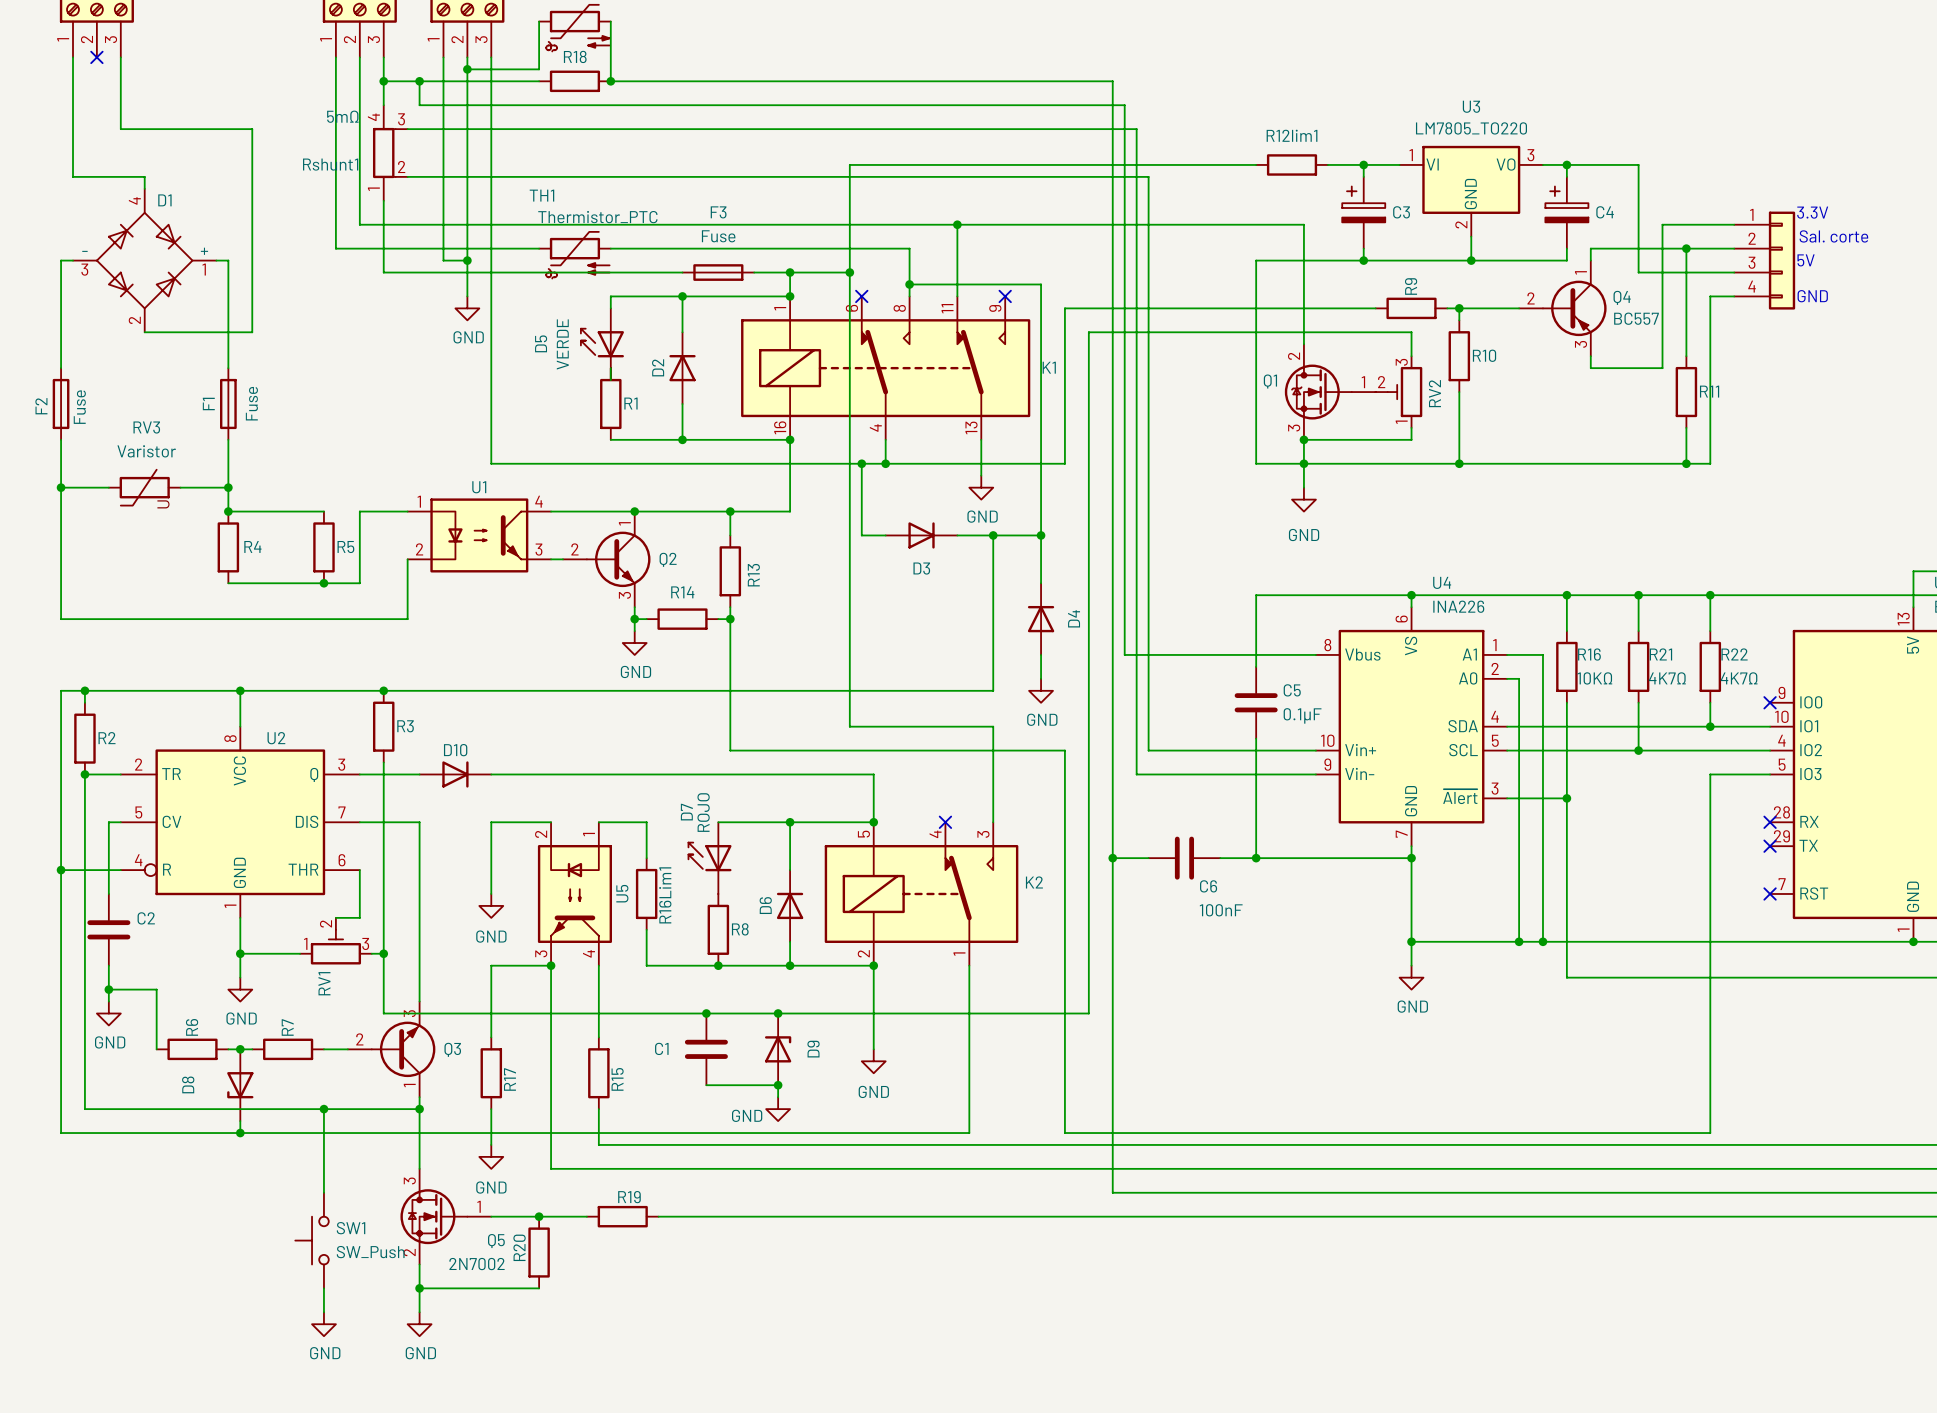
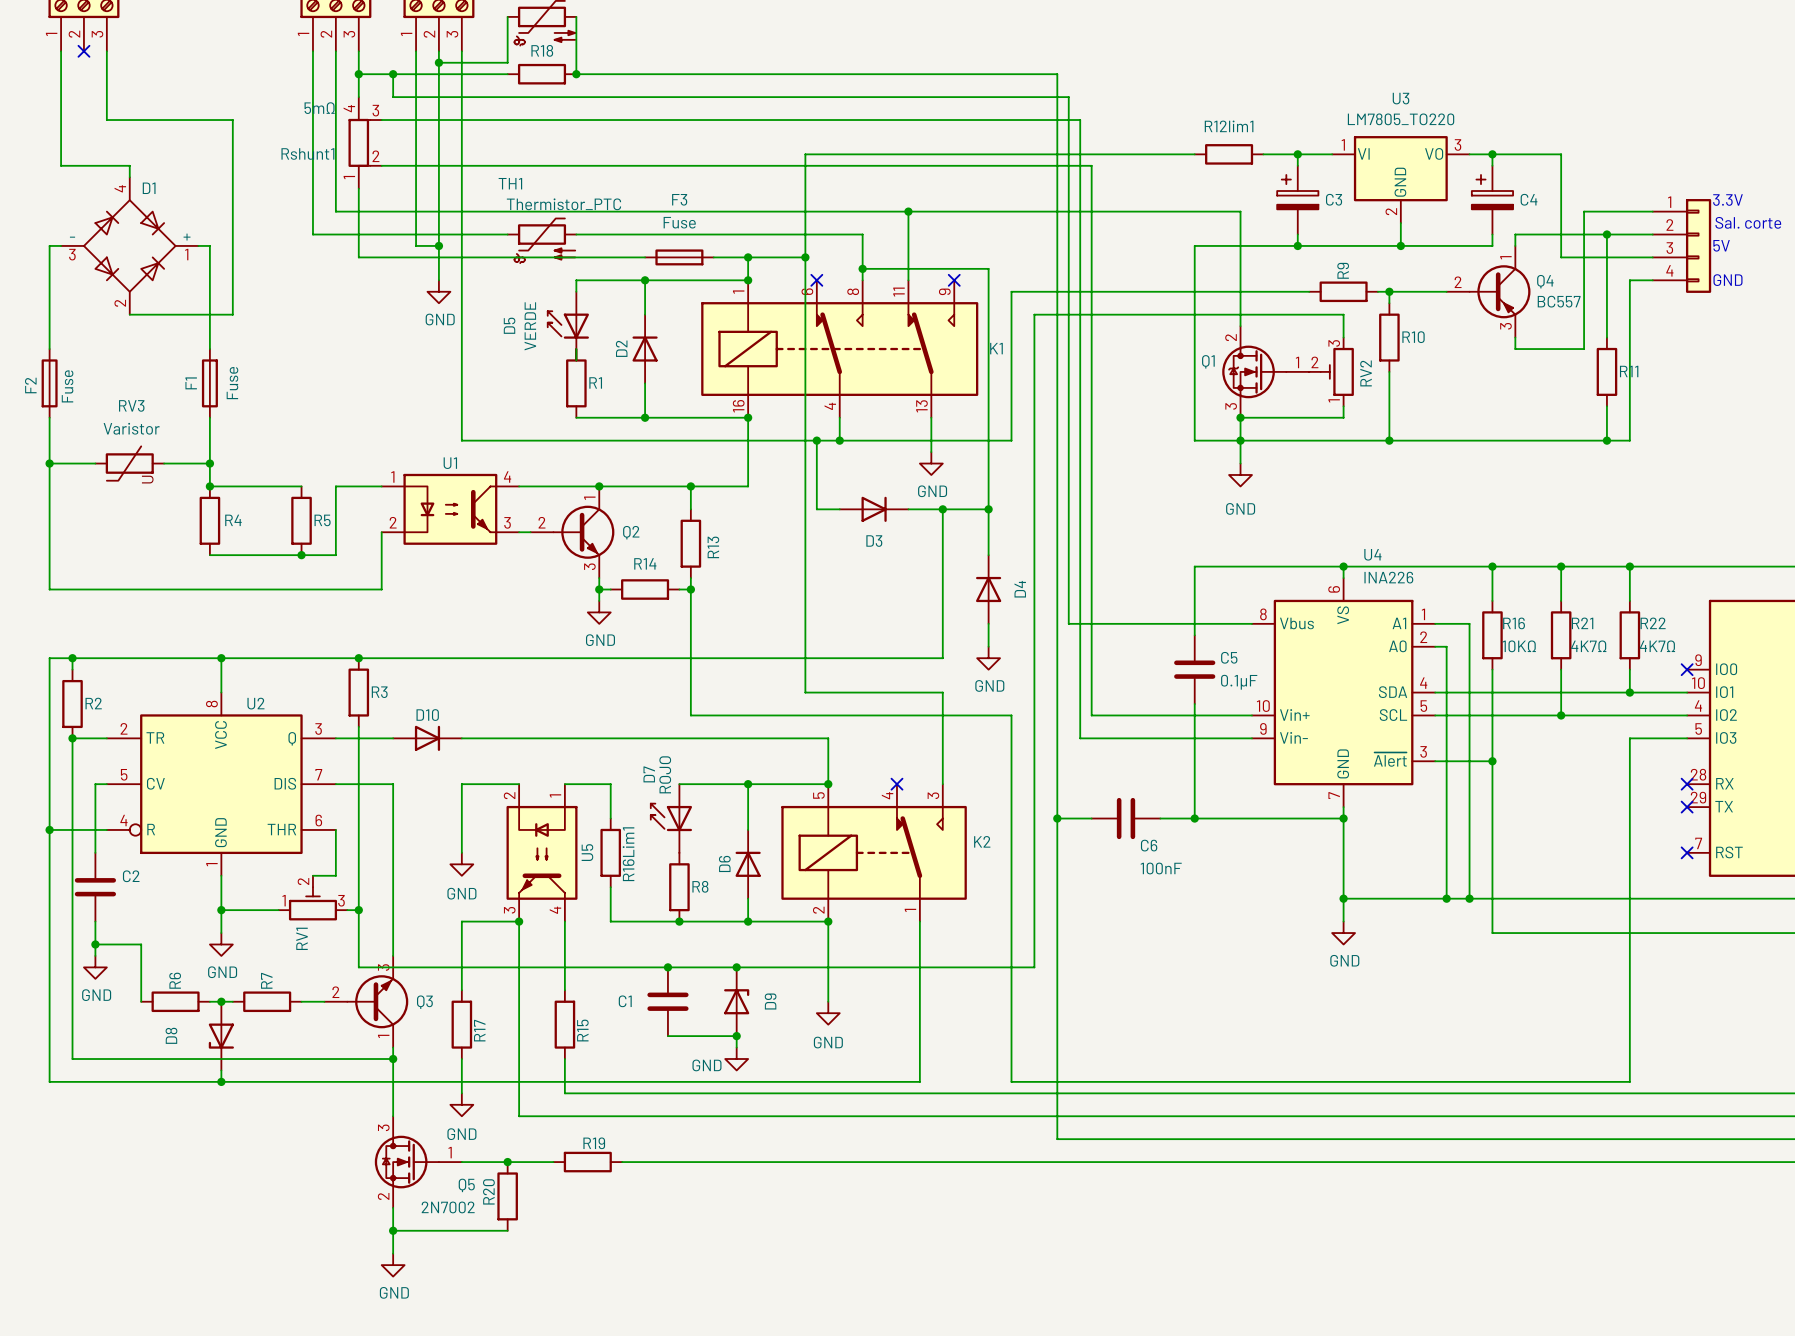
wire: (323, 1109) (323, 1192) -> none
junction: (323, 1109) -> none
SW1: SW_Push (312, 1240) -> none
wire: (323, 1288) (323, 1312) -> none
power symbol: GND (323, 1324) -> none

